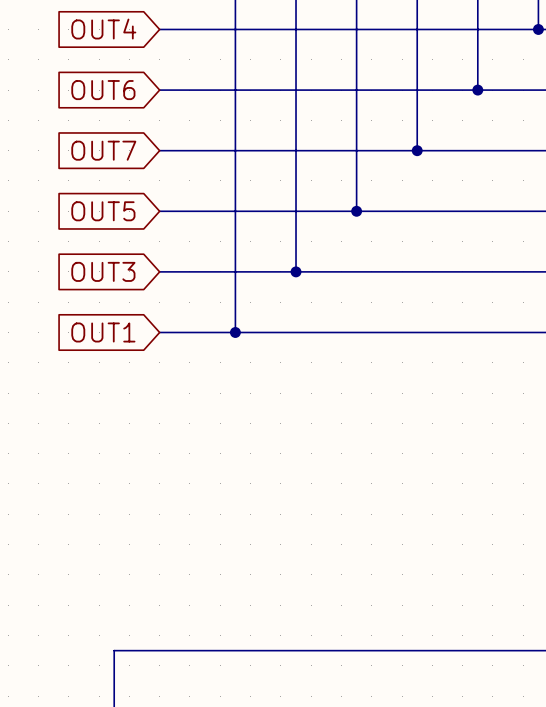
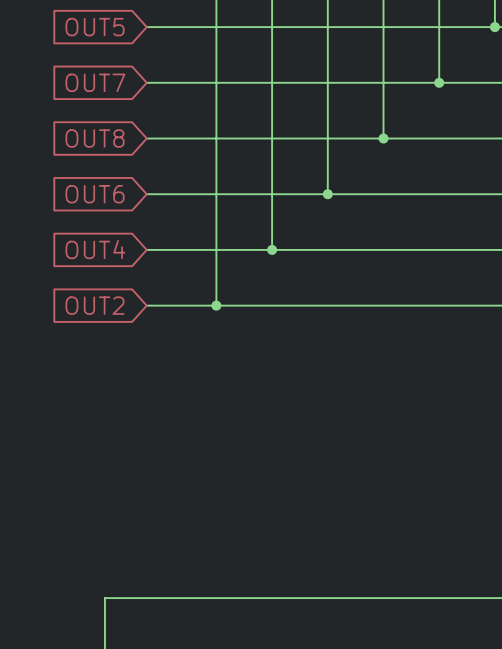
global label: OUT4 (103, 29) -> OUT5 (95, 27)
global label: OUT6 (103, 90) -> OUT7 (95, 82)
global label: OUT7 (103, 150) -> OUT8 (95, 138)
global label: OUT5 (103, 211) -> OUT6 (95, 194)
global label: OUT3 (103, 271) -> OUT4 (95, 249)
global label: OUT1 (103, 332) -> OUT2 (95, 305)

